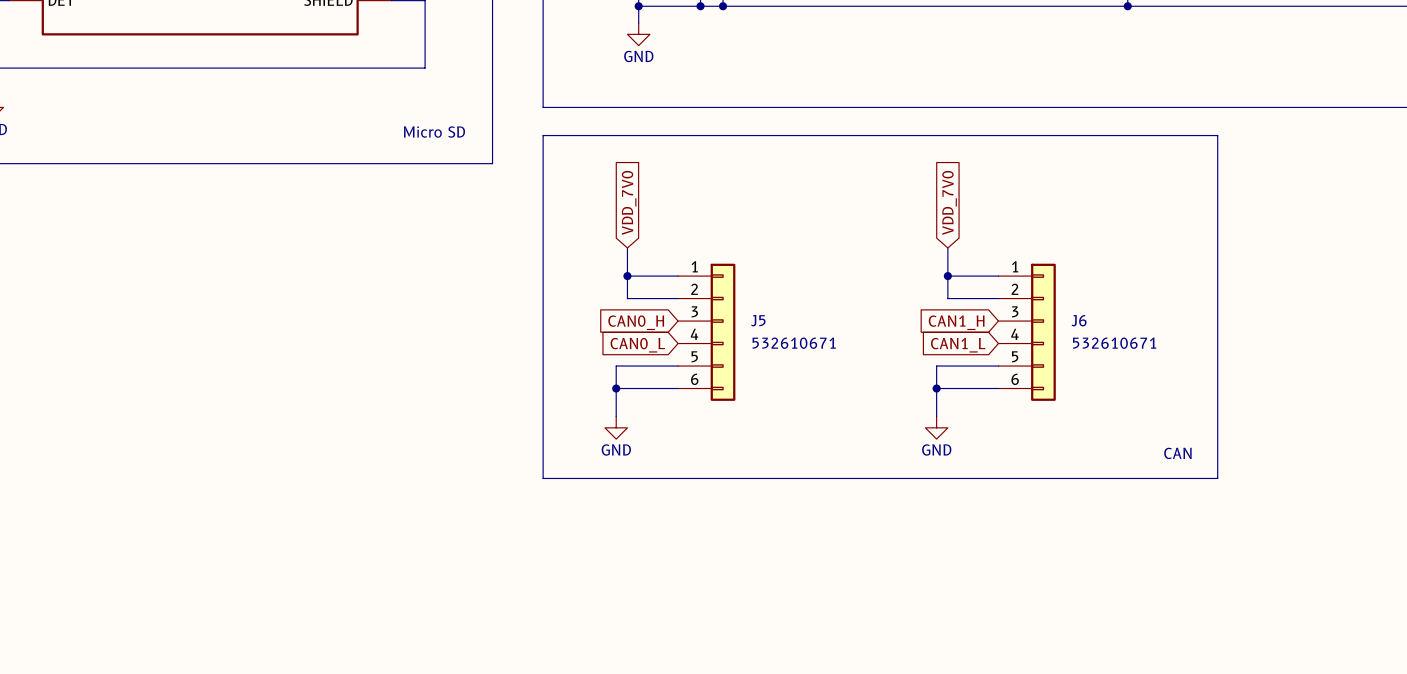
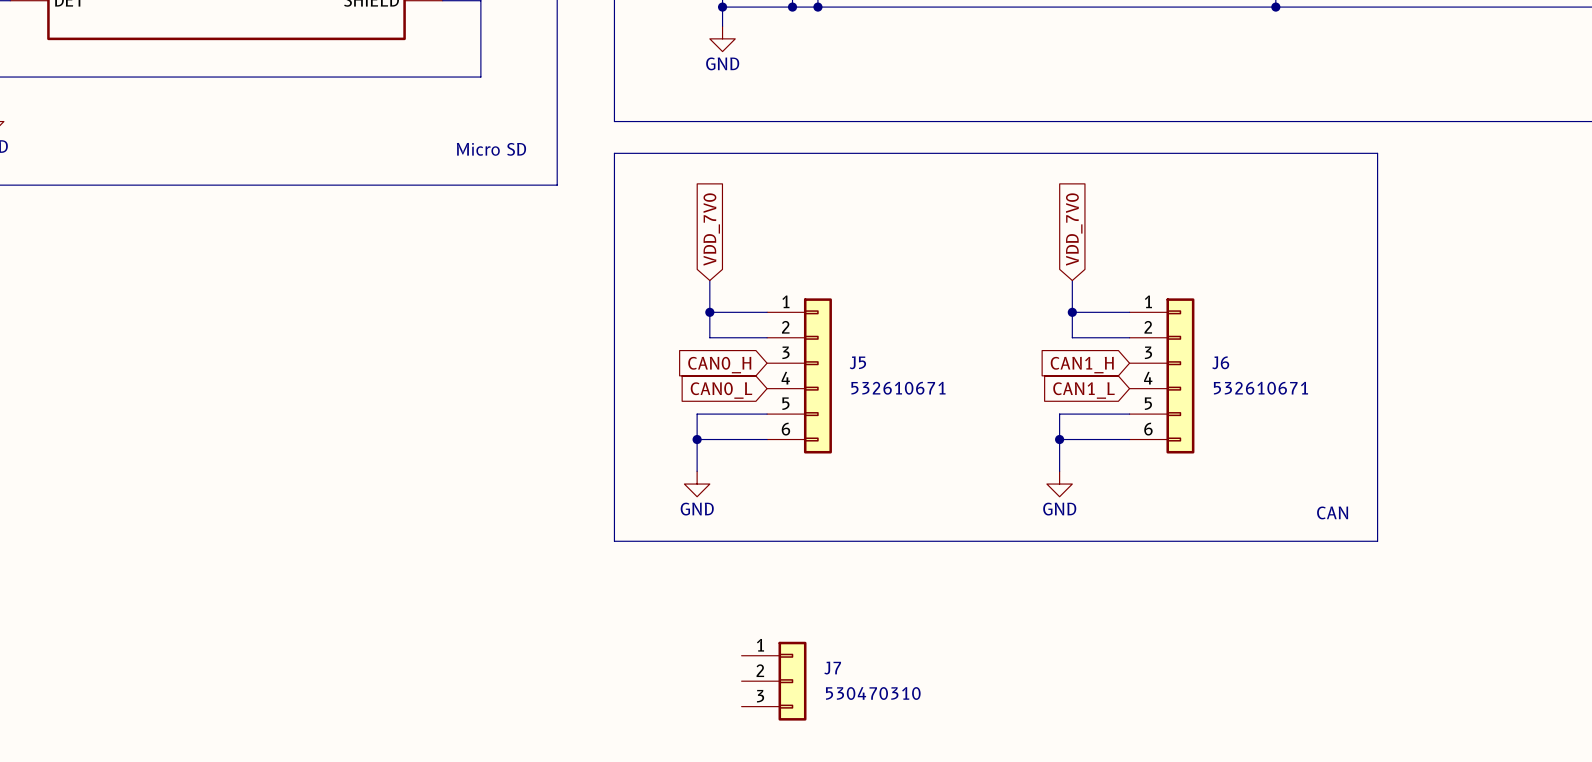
J7: none -> 530470310 (774, 681)

